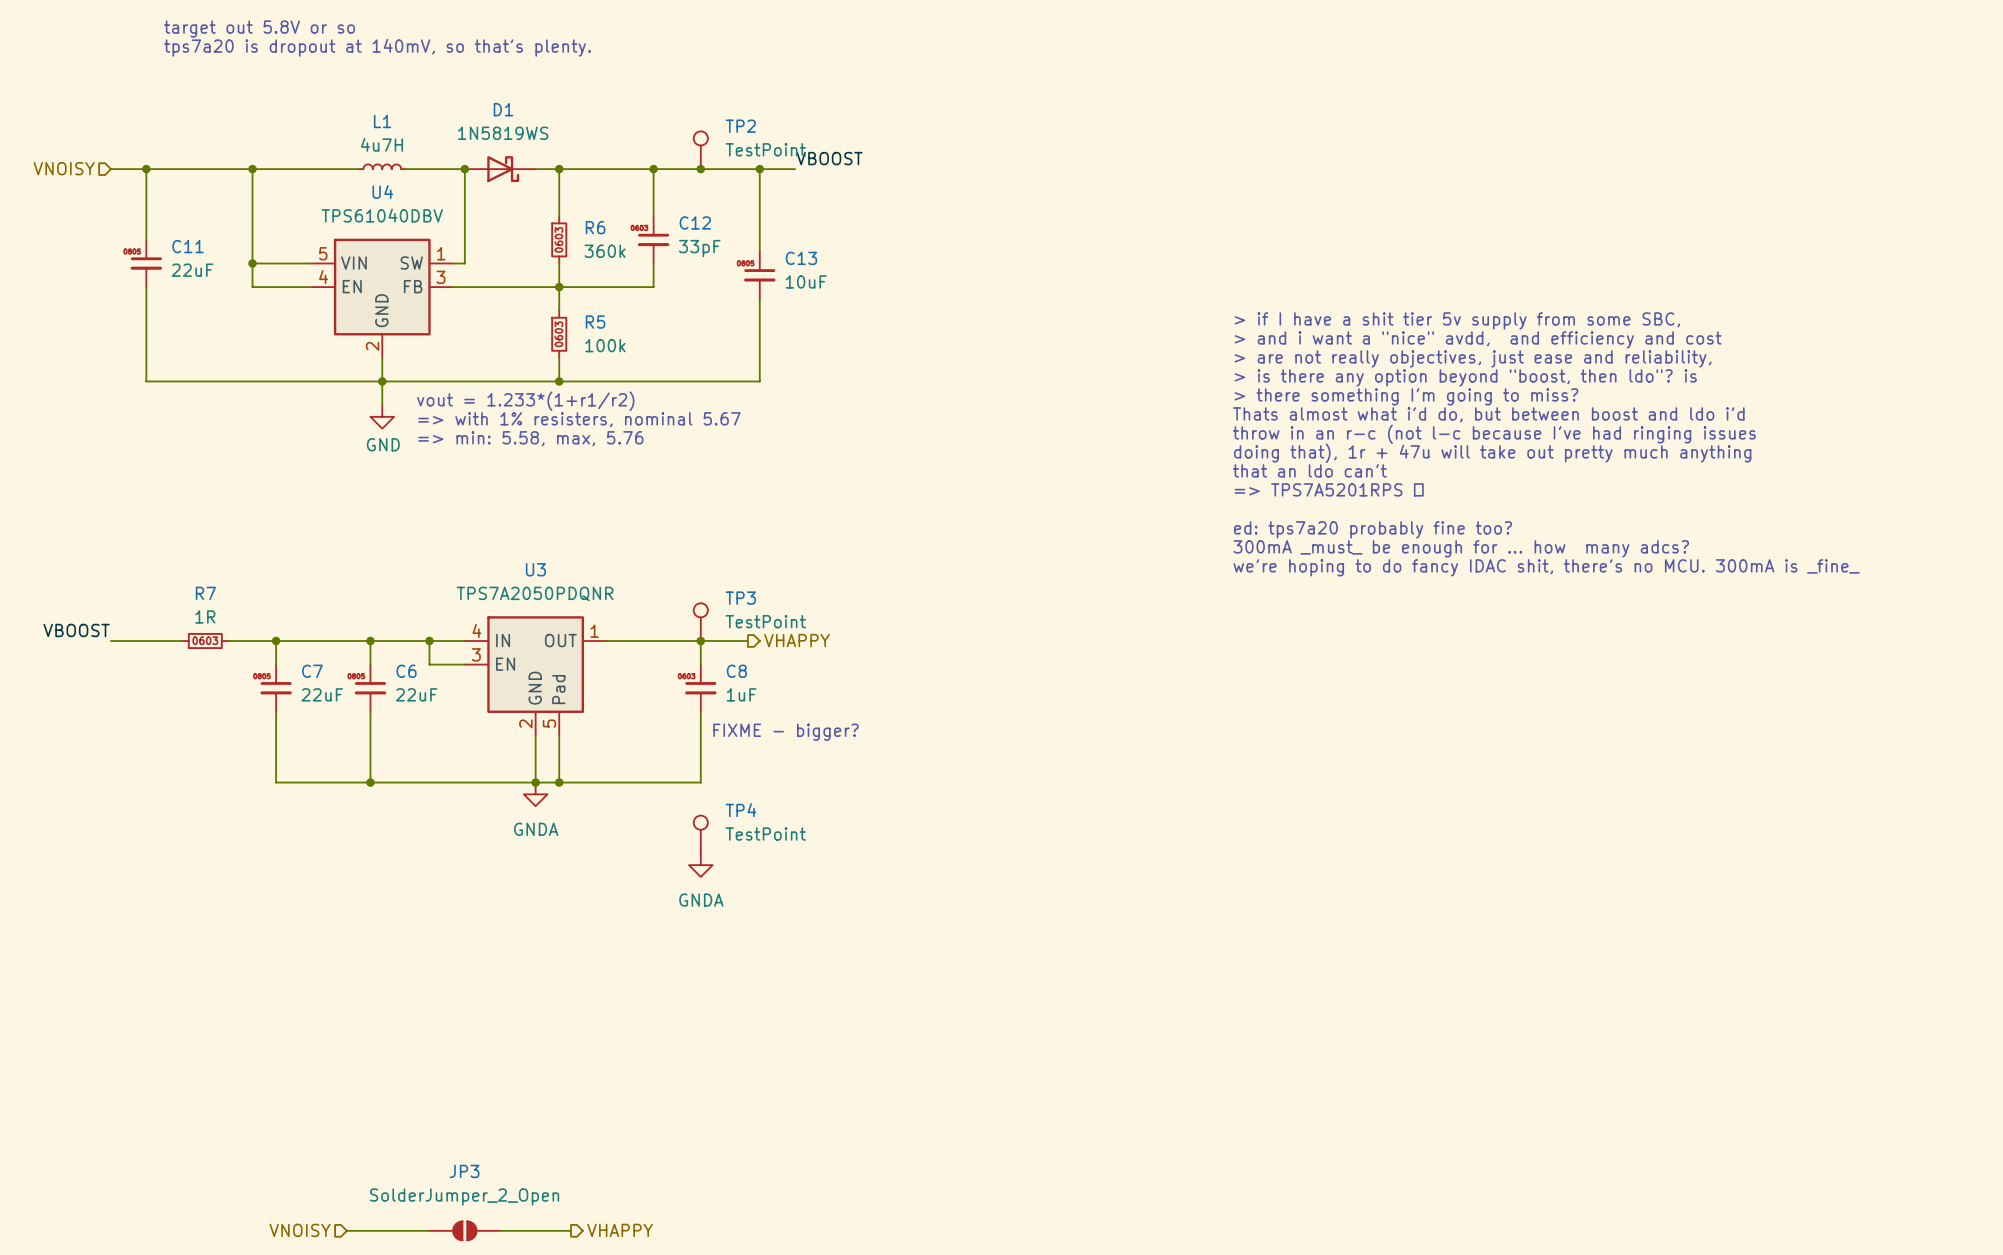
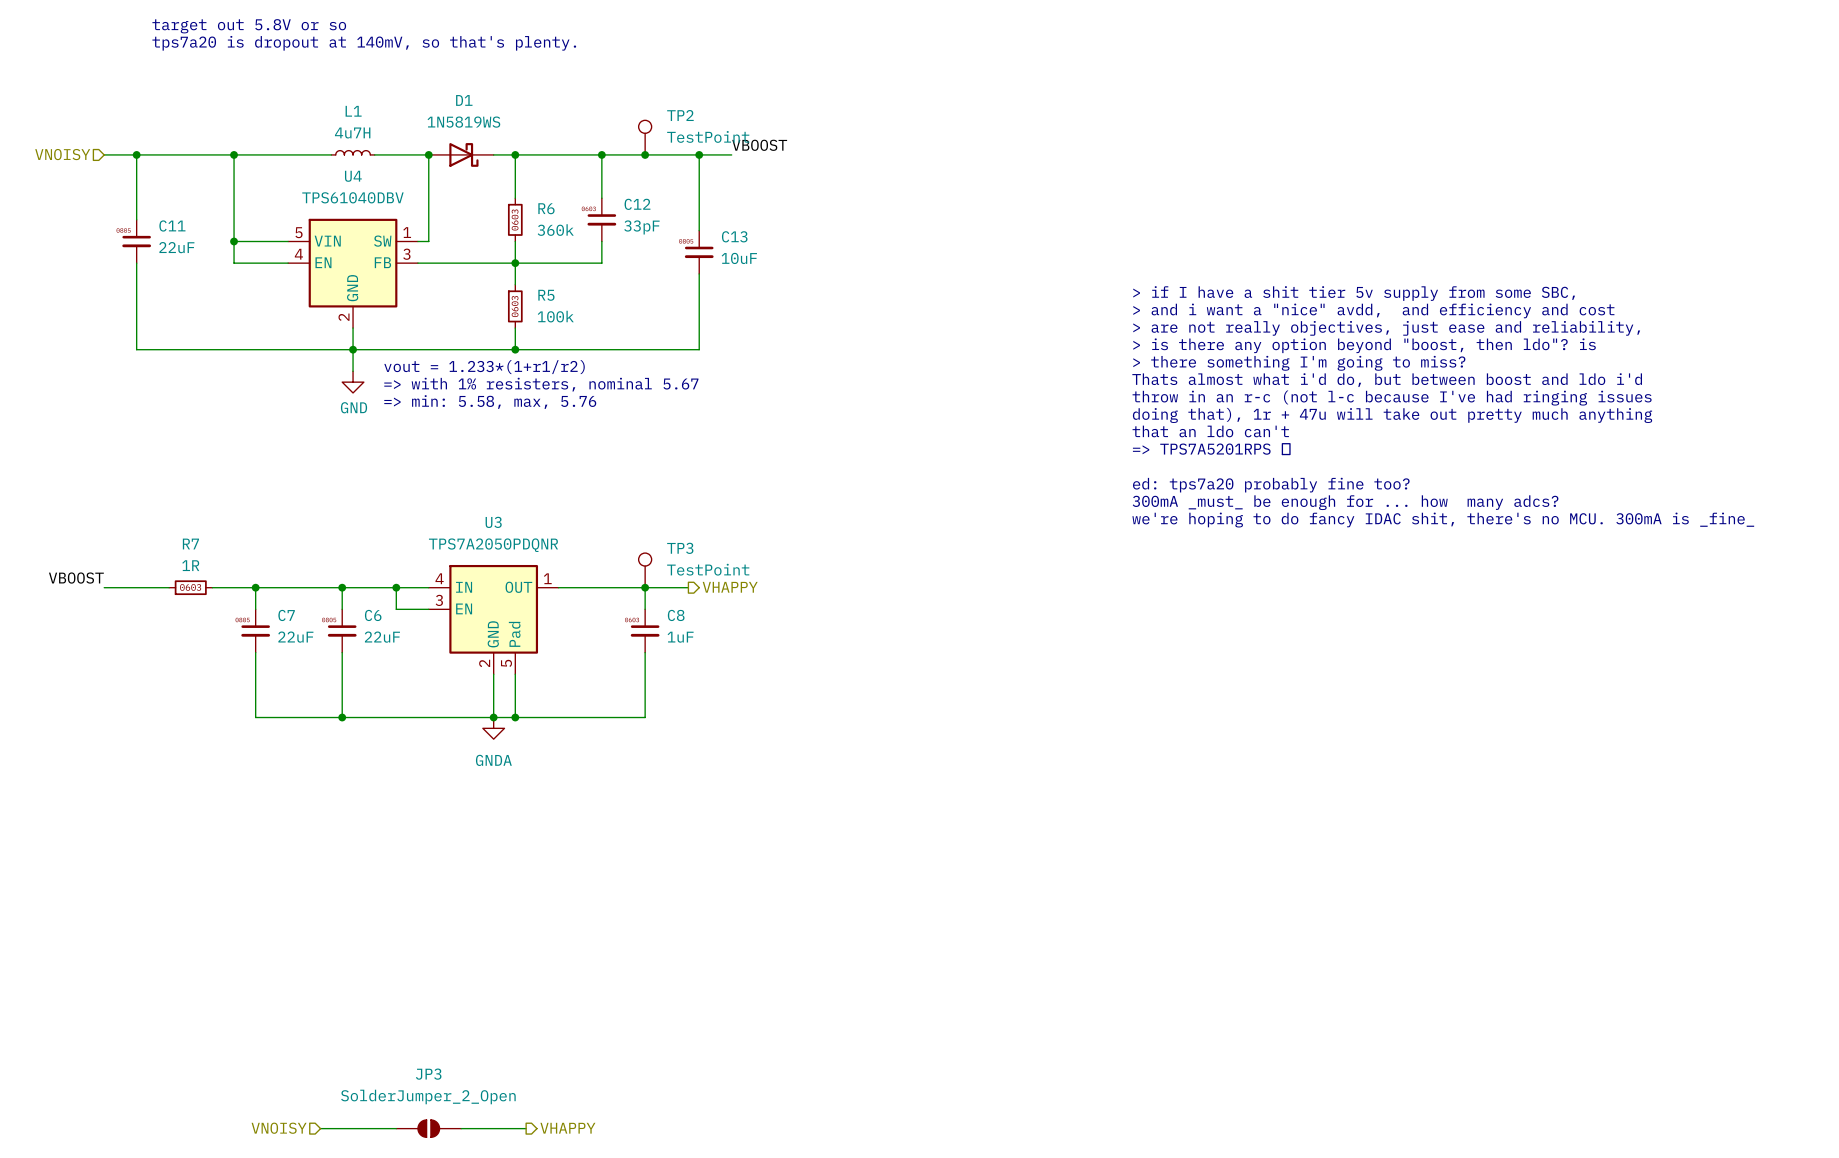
text: FIXME - bigger? (786, 732) -> none
TP4: TestPoint (700, 834) -> none
power symbol: GNDA (700, 865) -> none

